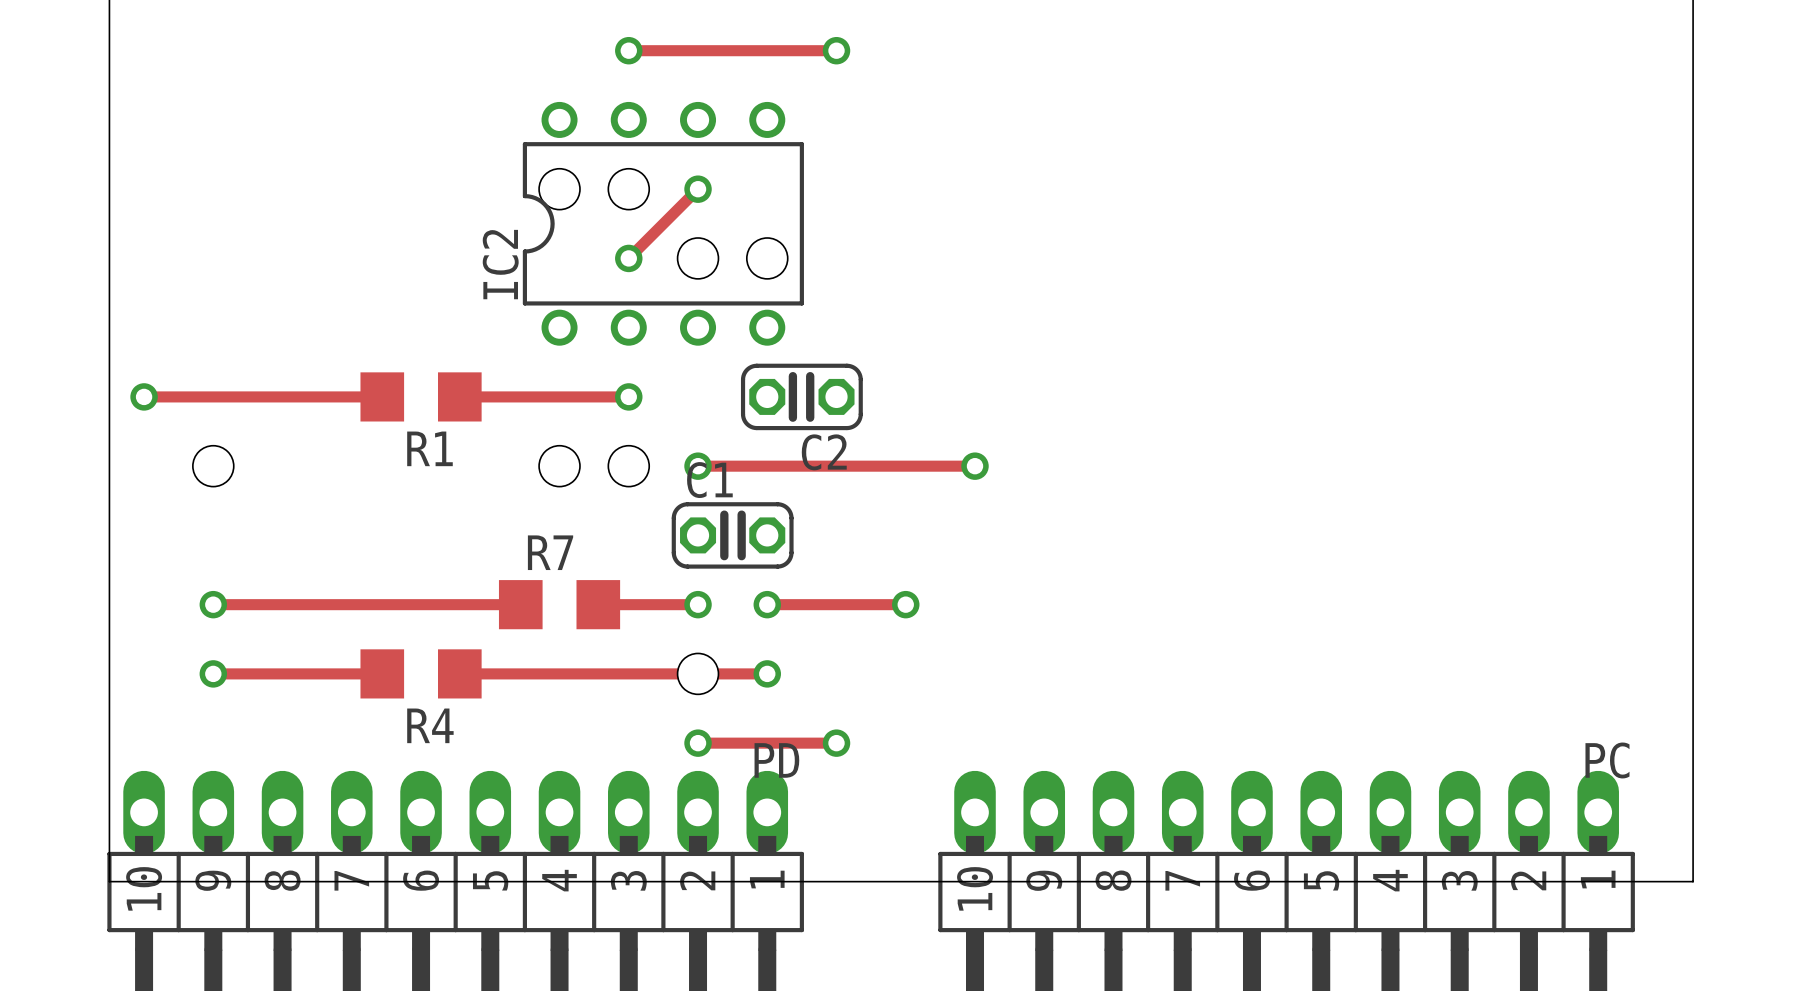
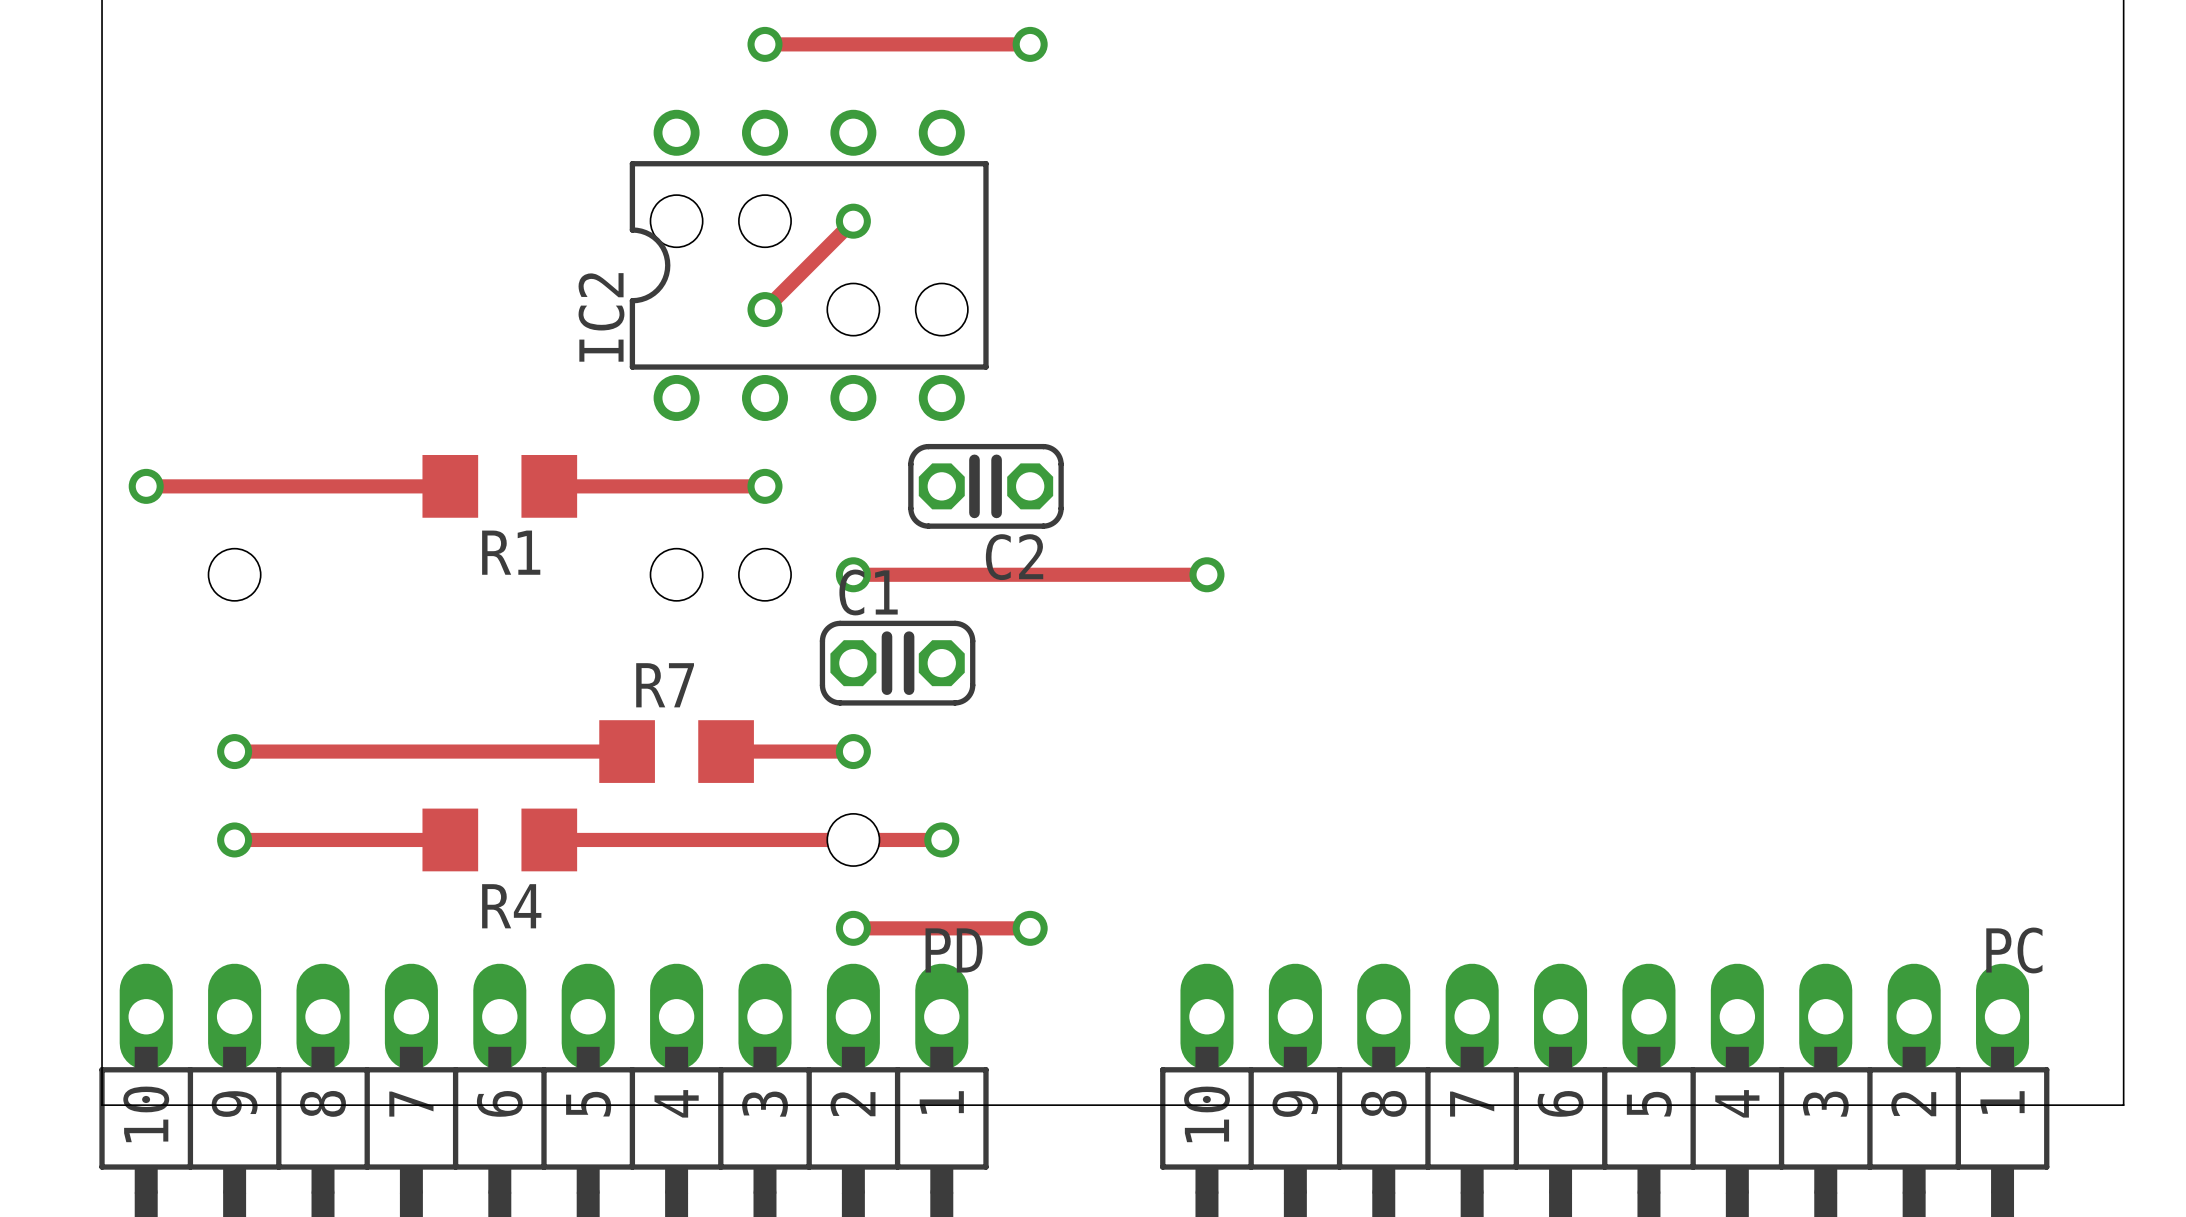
track: (767, 604) (905, 604) -> none
via: (767, 604) -> none
via: (905, 604) -> none

